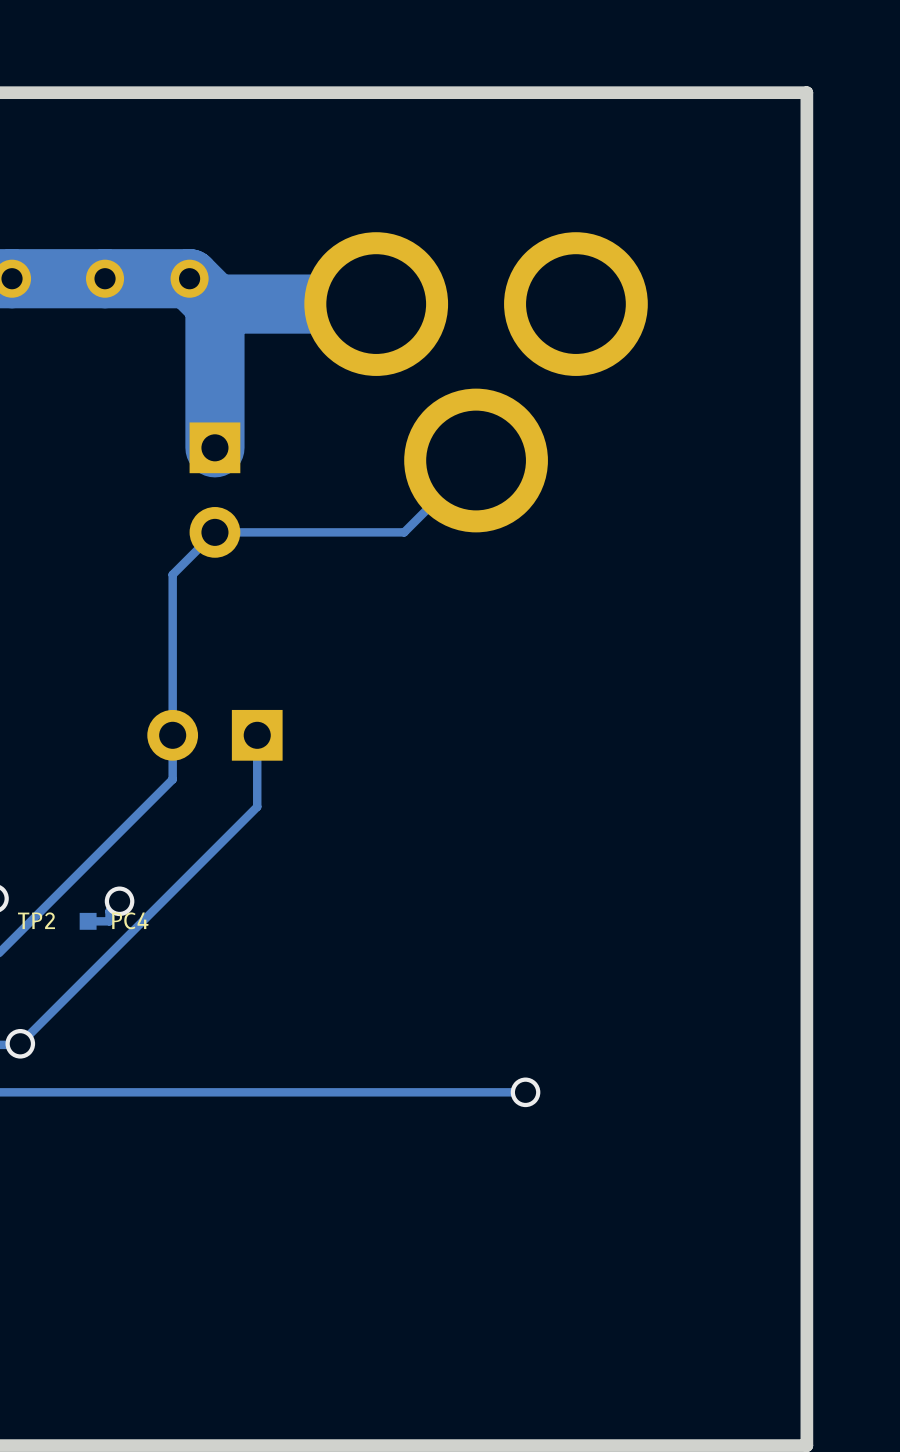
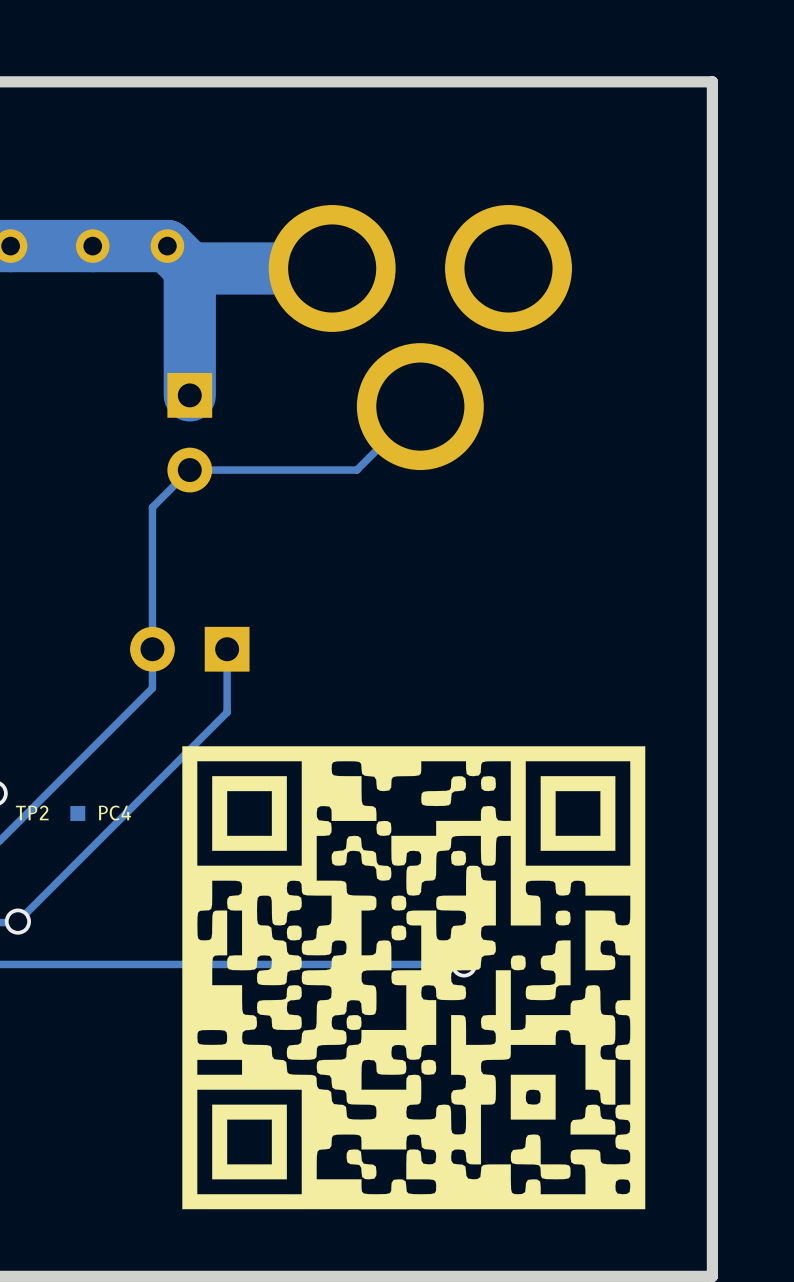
drawing: none -> [182, 746, 646, 1210]
track: (119, 901) (109, 911) (109, 921) (88, 921) -> none
via: (119, 901) -> none

